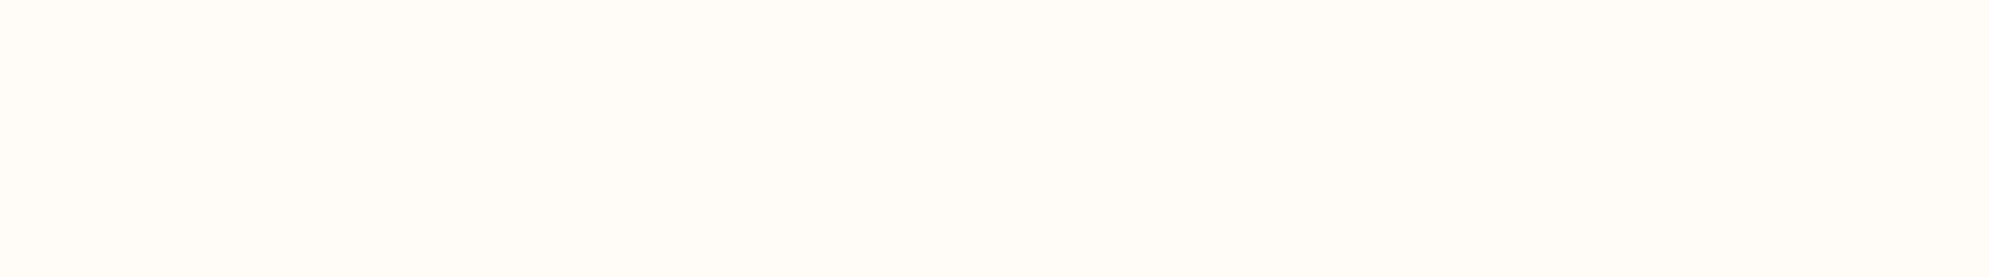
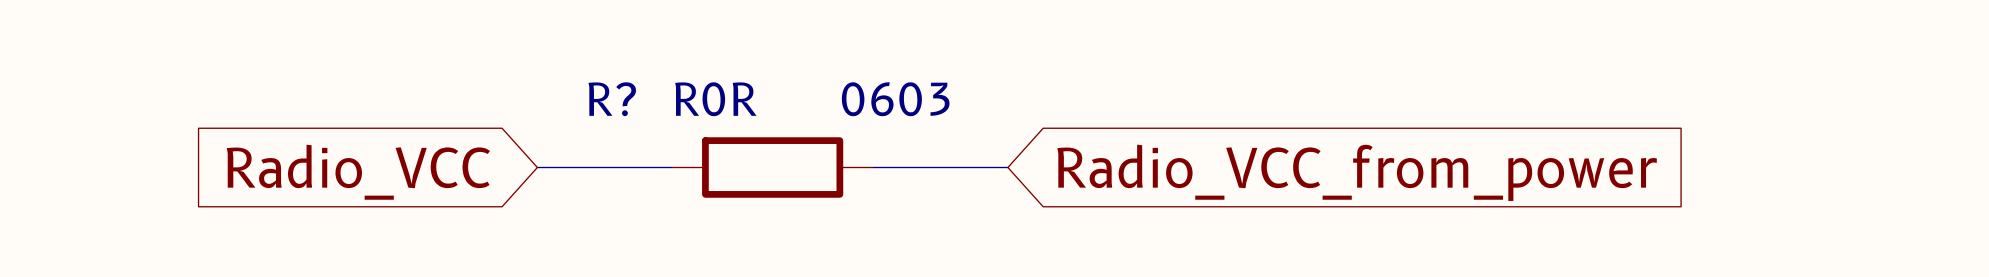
wire: none -> (537, 167) (671, 167)
R?: none -> R0R (772, 167)
wire: none -> (873, 167) (1007, 167)
global label: none -> Radio_VCC (358, 172)
global label: none -> Radio_VCC_from_power (1357, 172)

